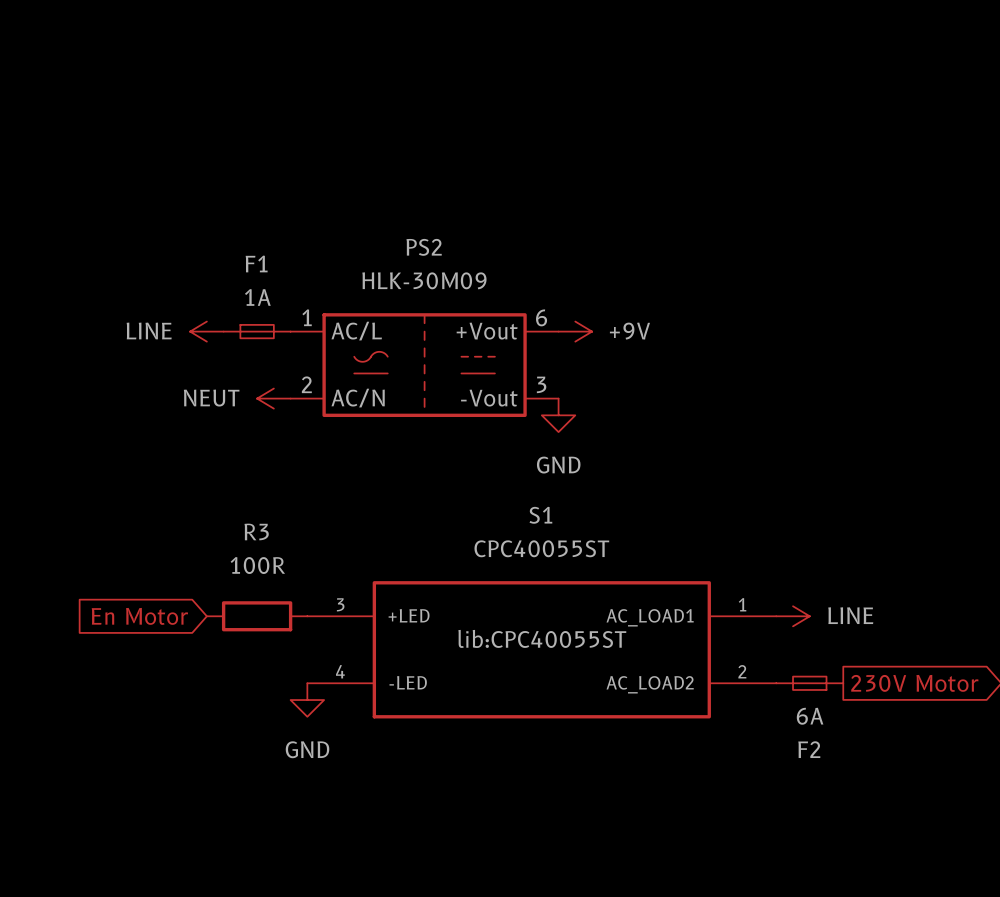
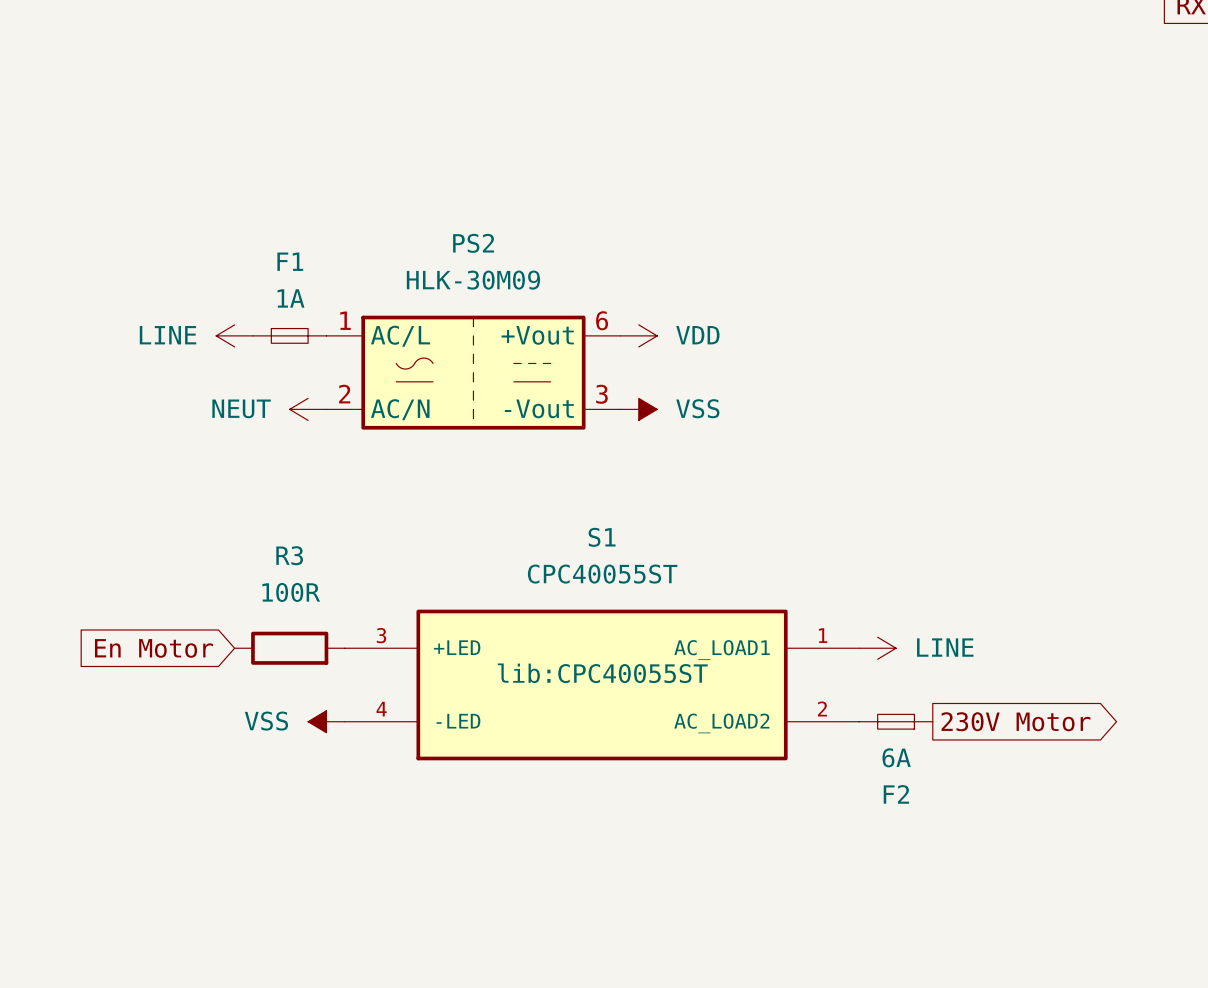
power symbol: +9V (575, 331) -> VDD (638, 335)
power symbol: none -> VSS (638, 409)
power symbol: GND (558, 415) -> none
power symbol: none -> VSS (326, 721)
power symbol: GND (307, 700) -> none

